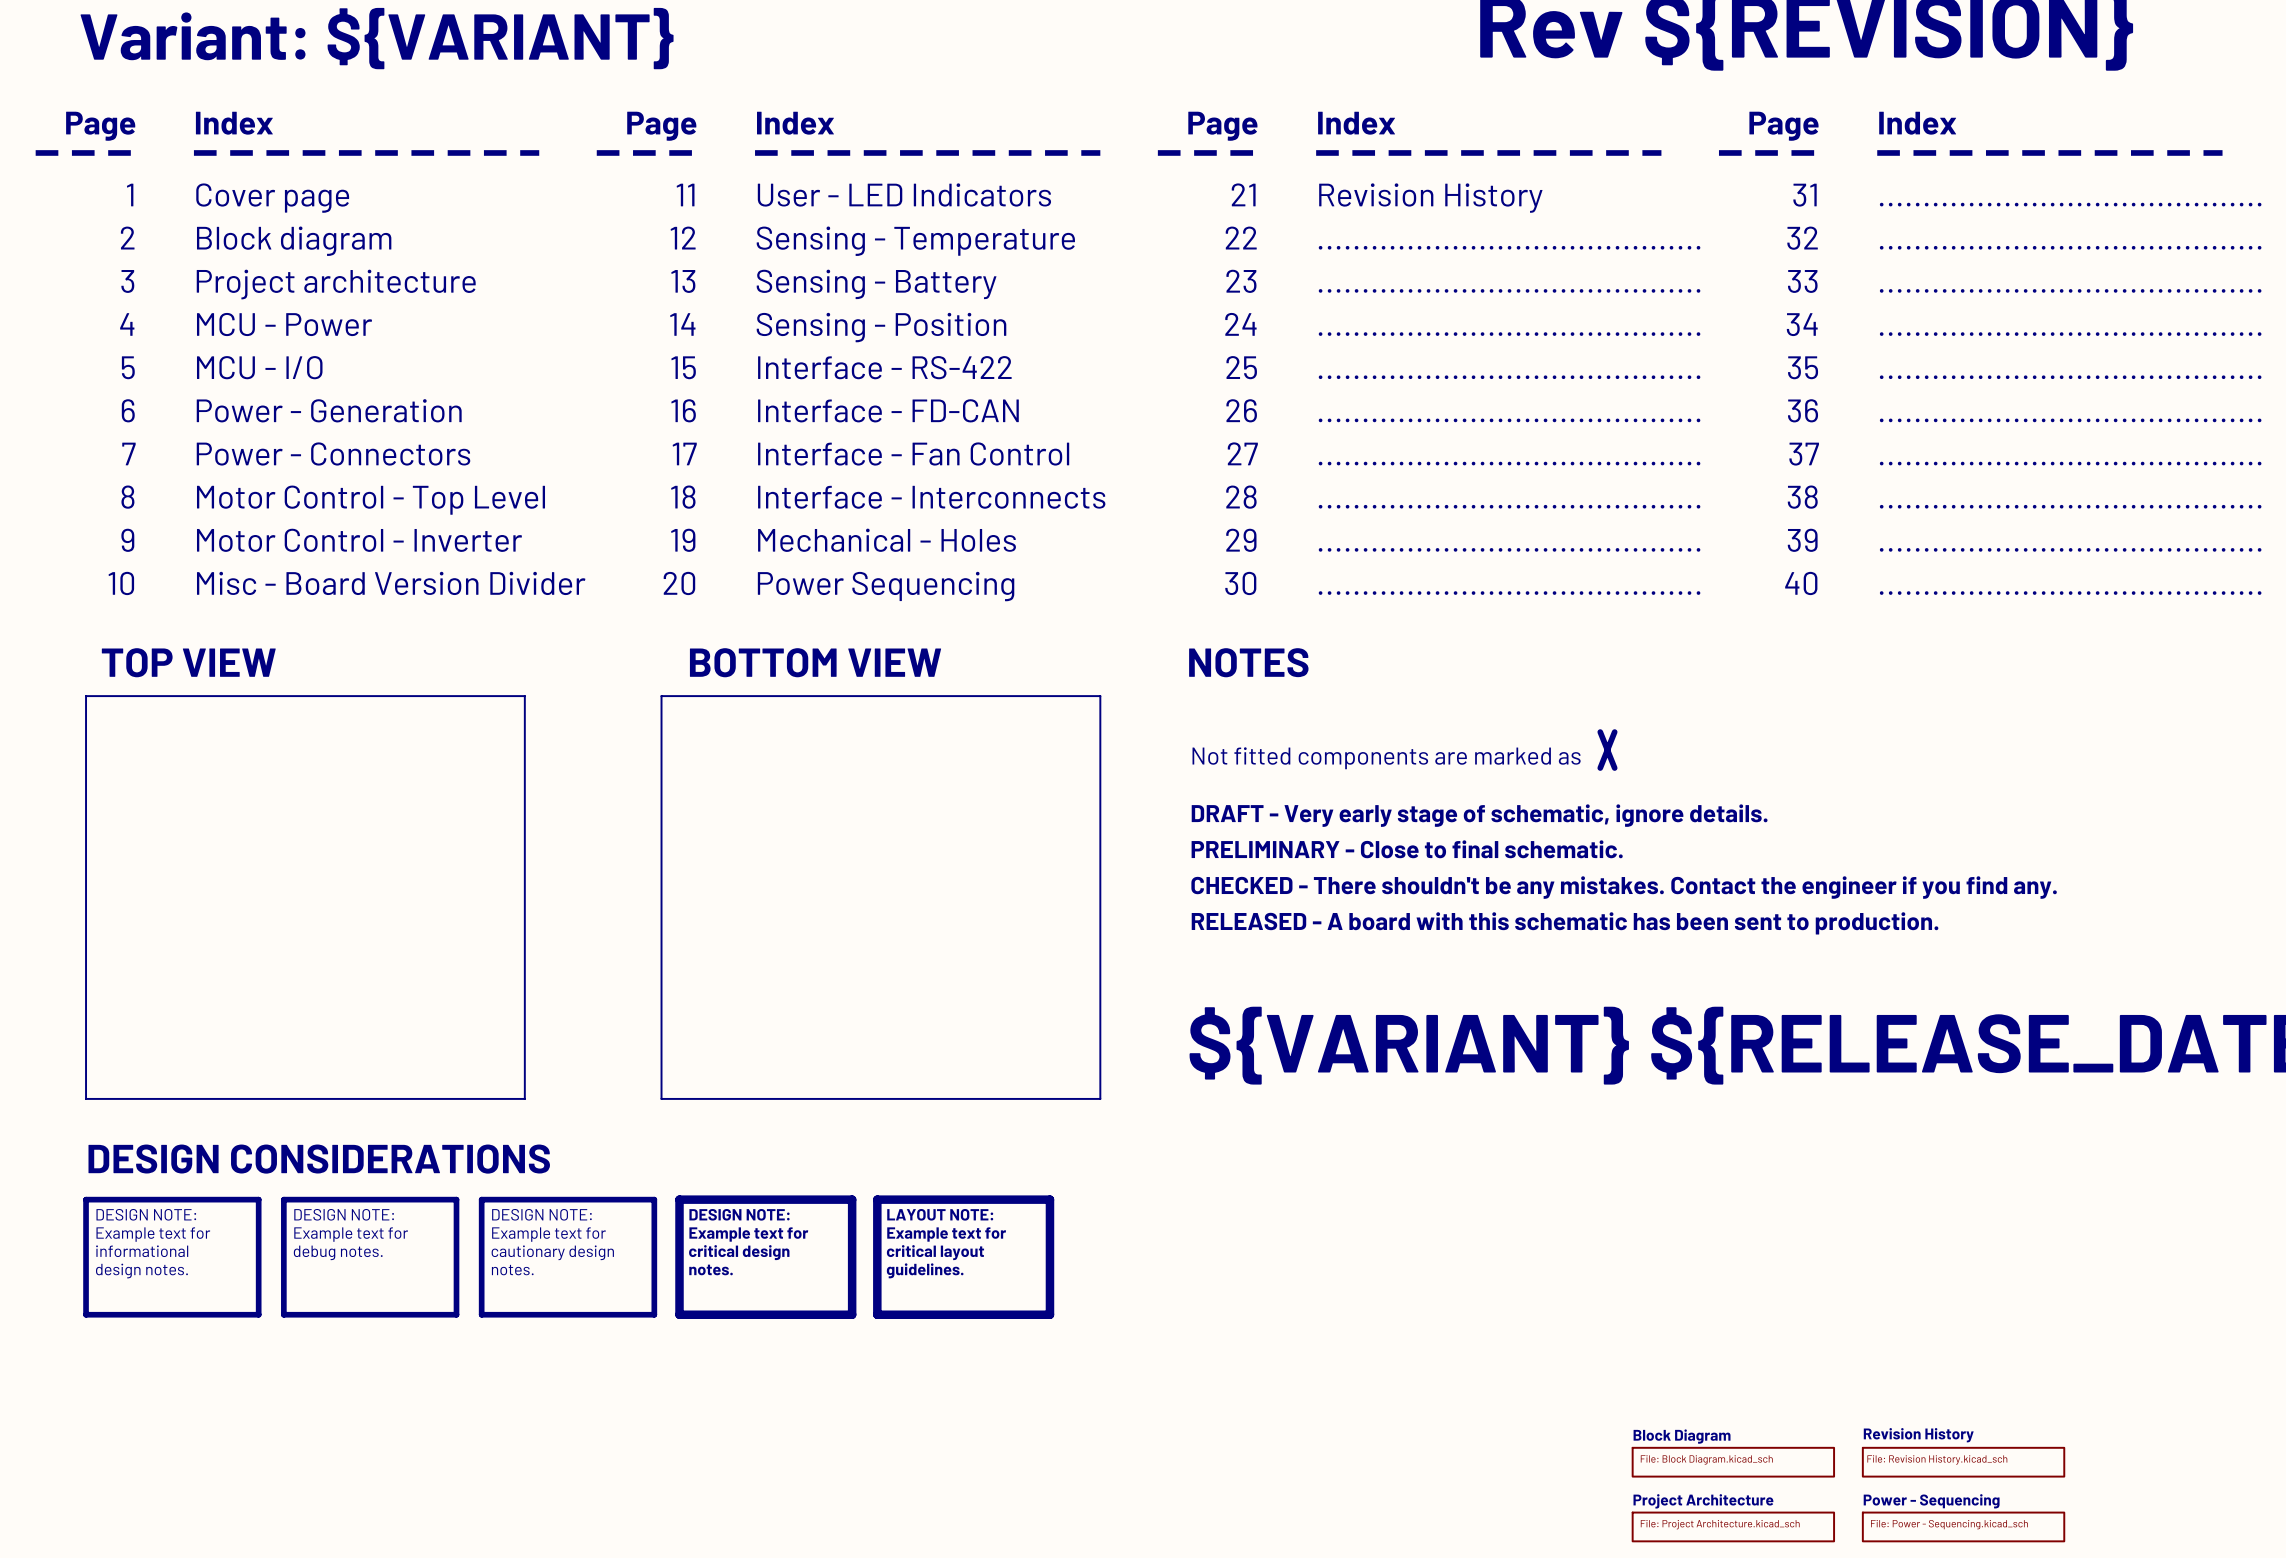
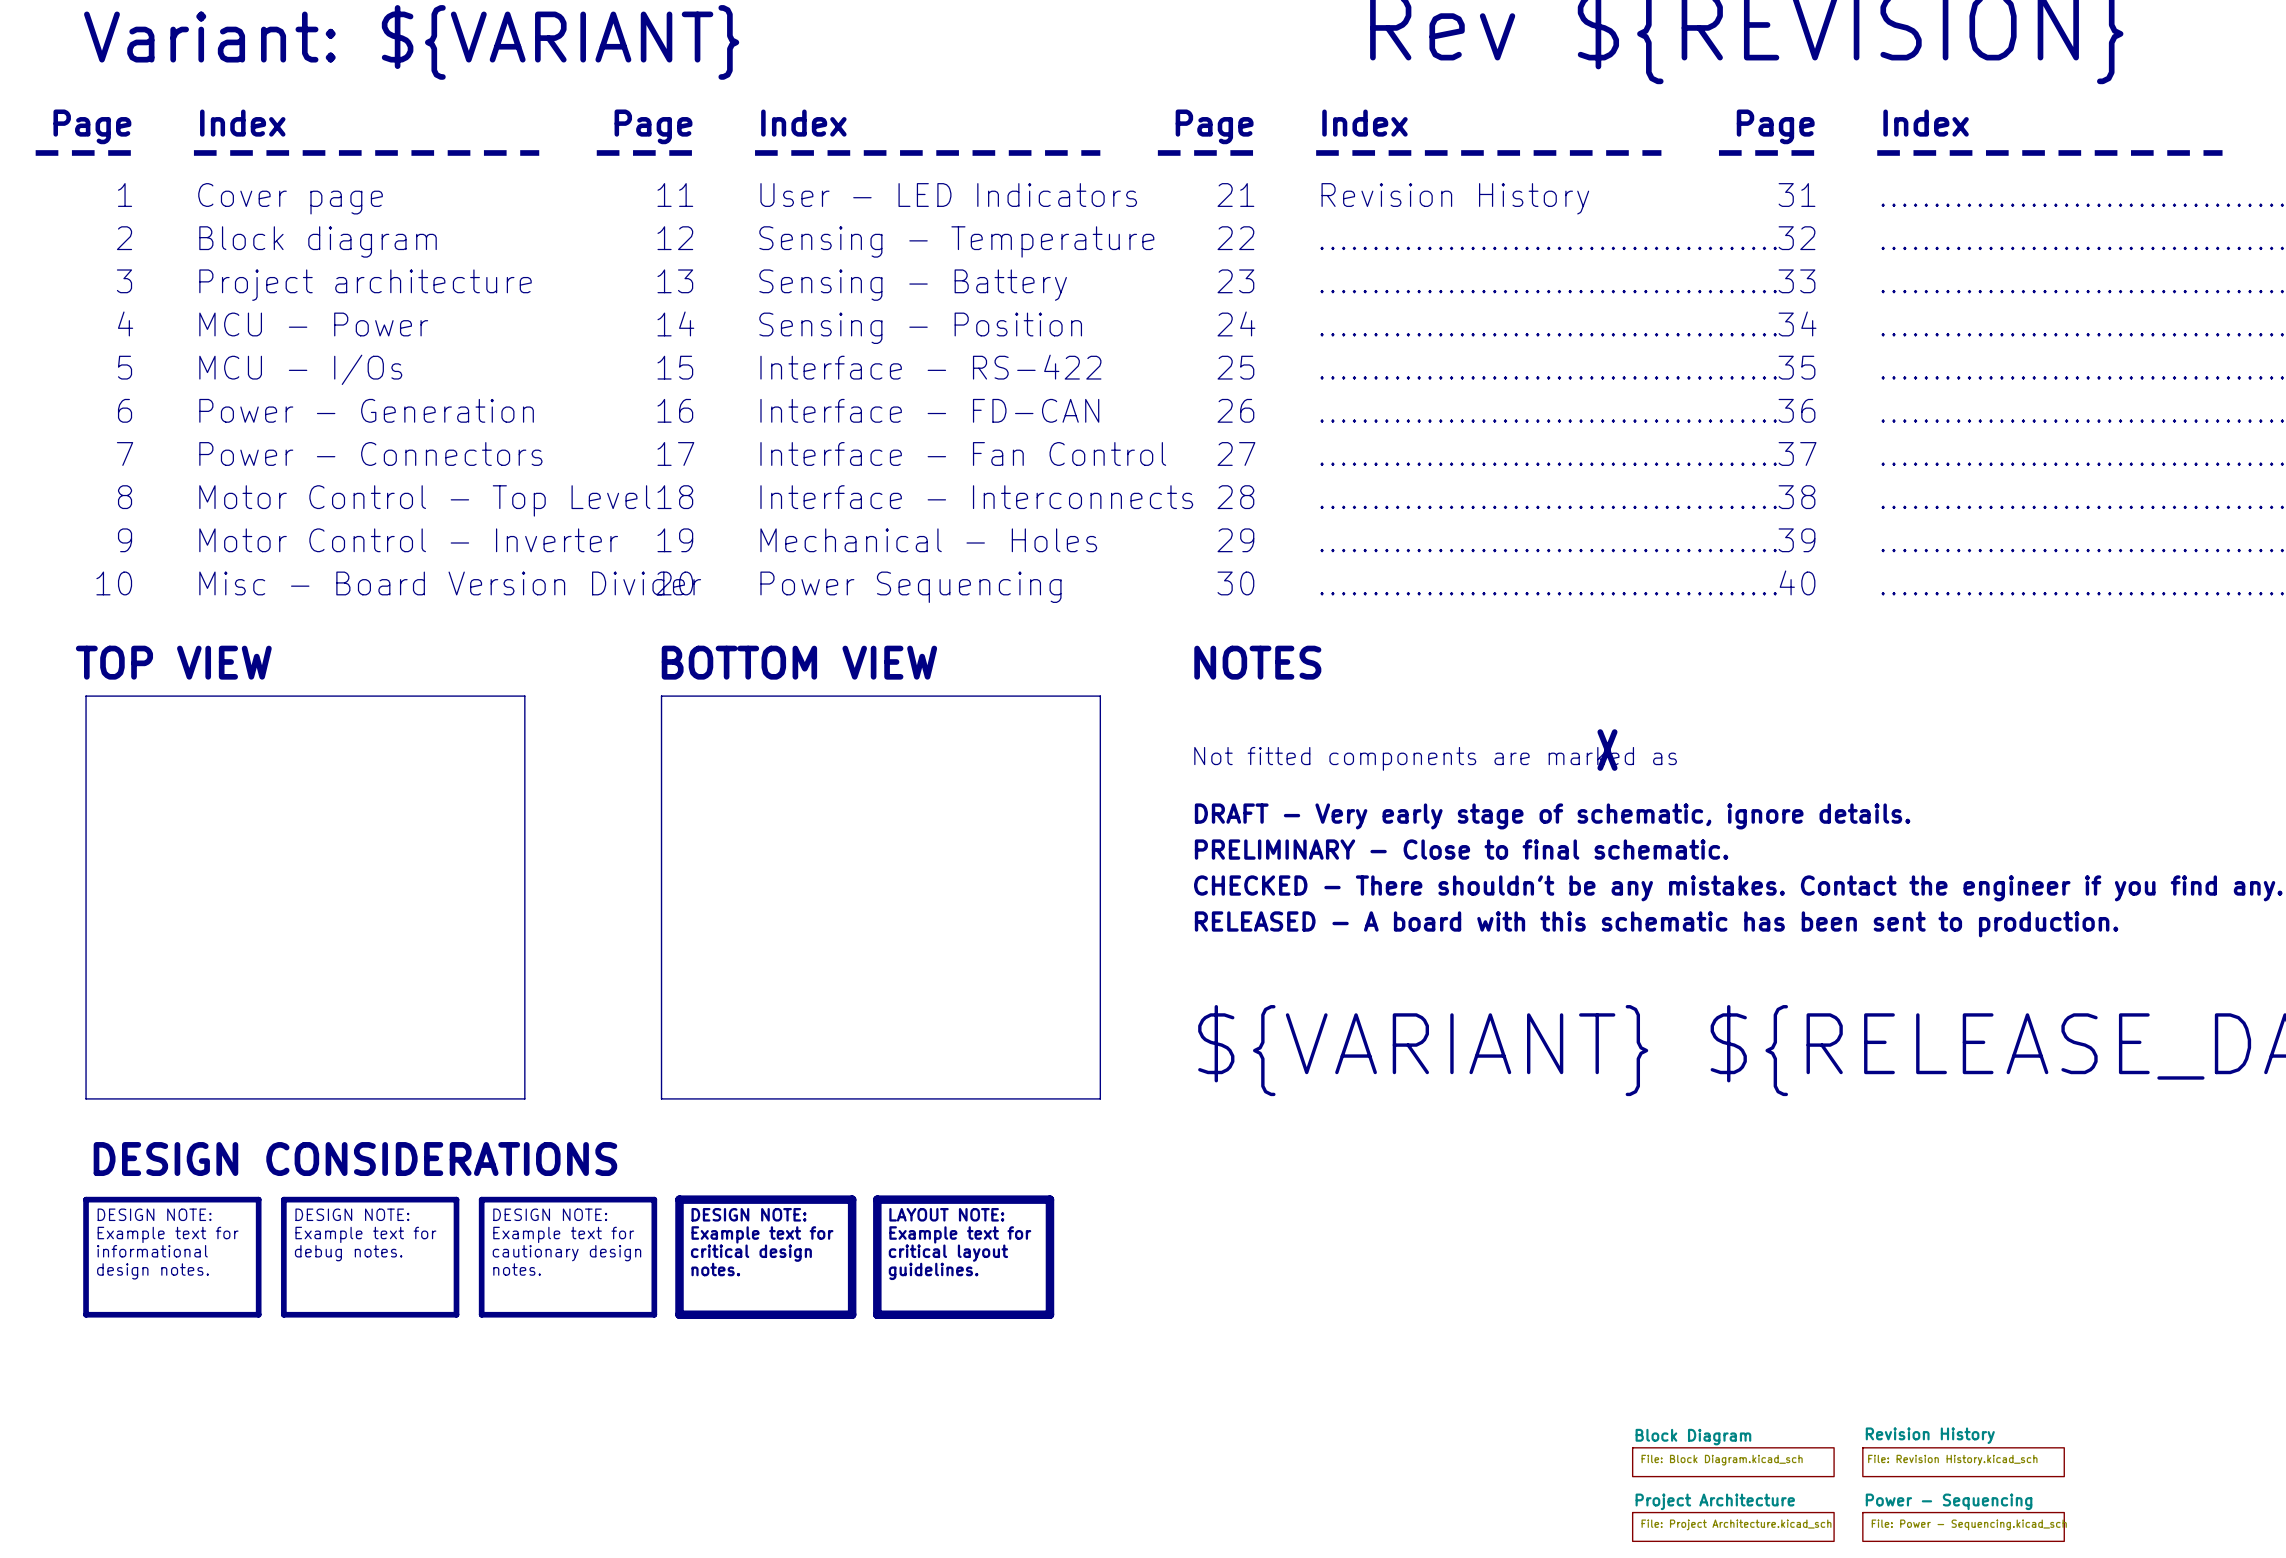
text: MCU - I/O (259, 367) -> MCU - I/Os (300, 369)

